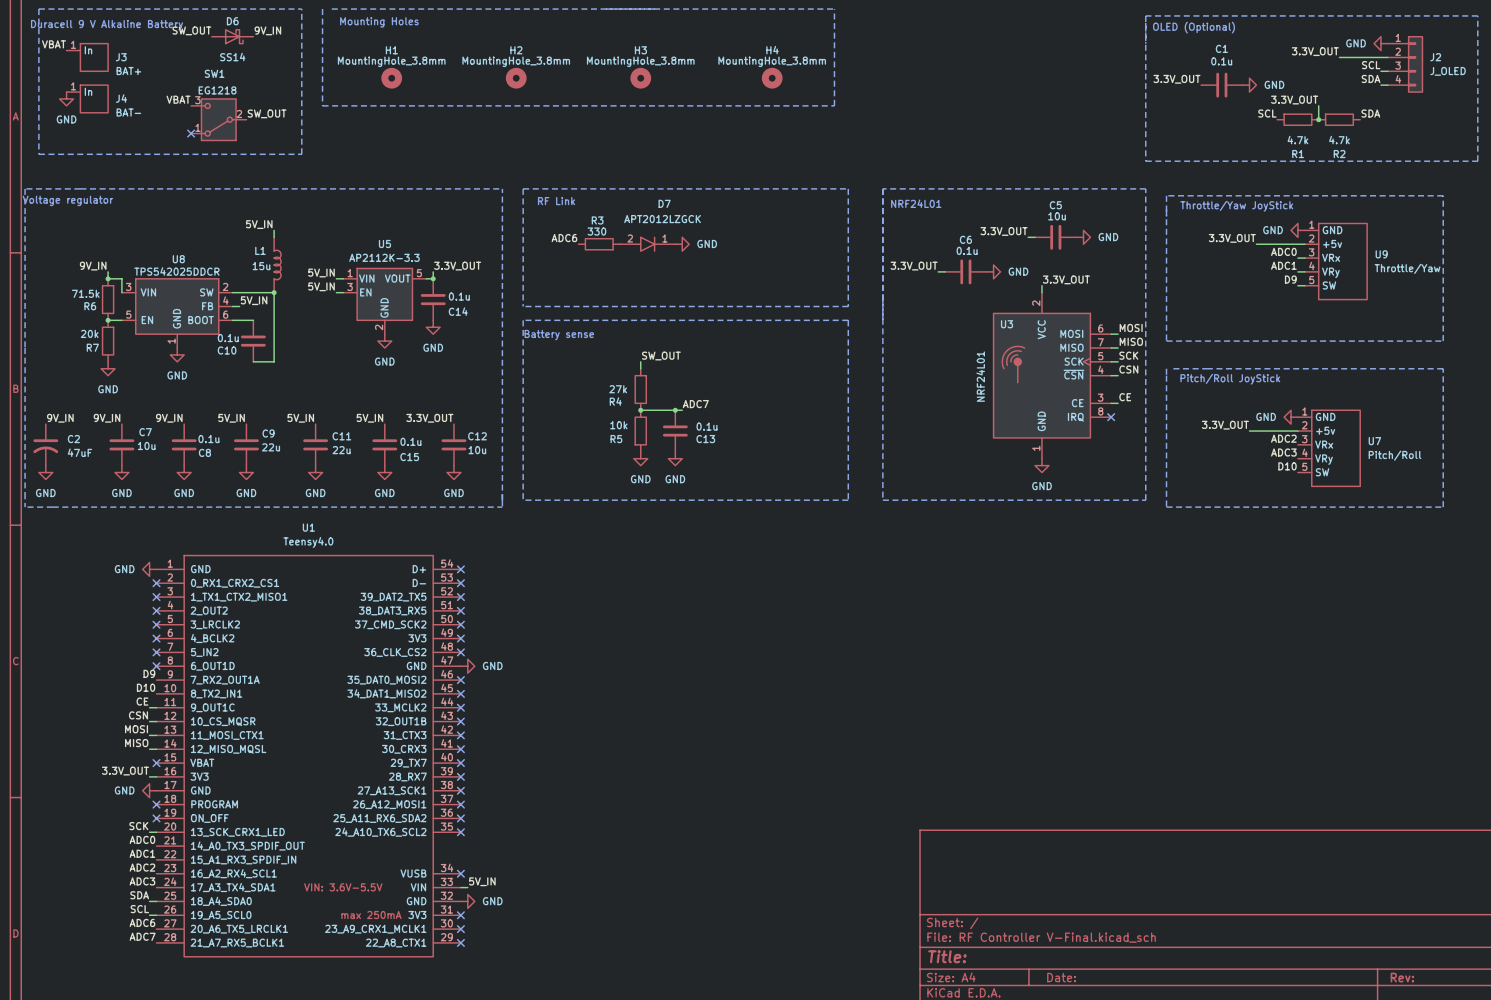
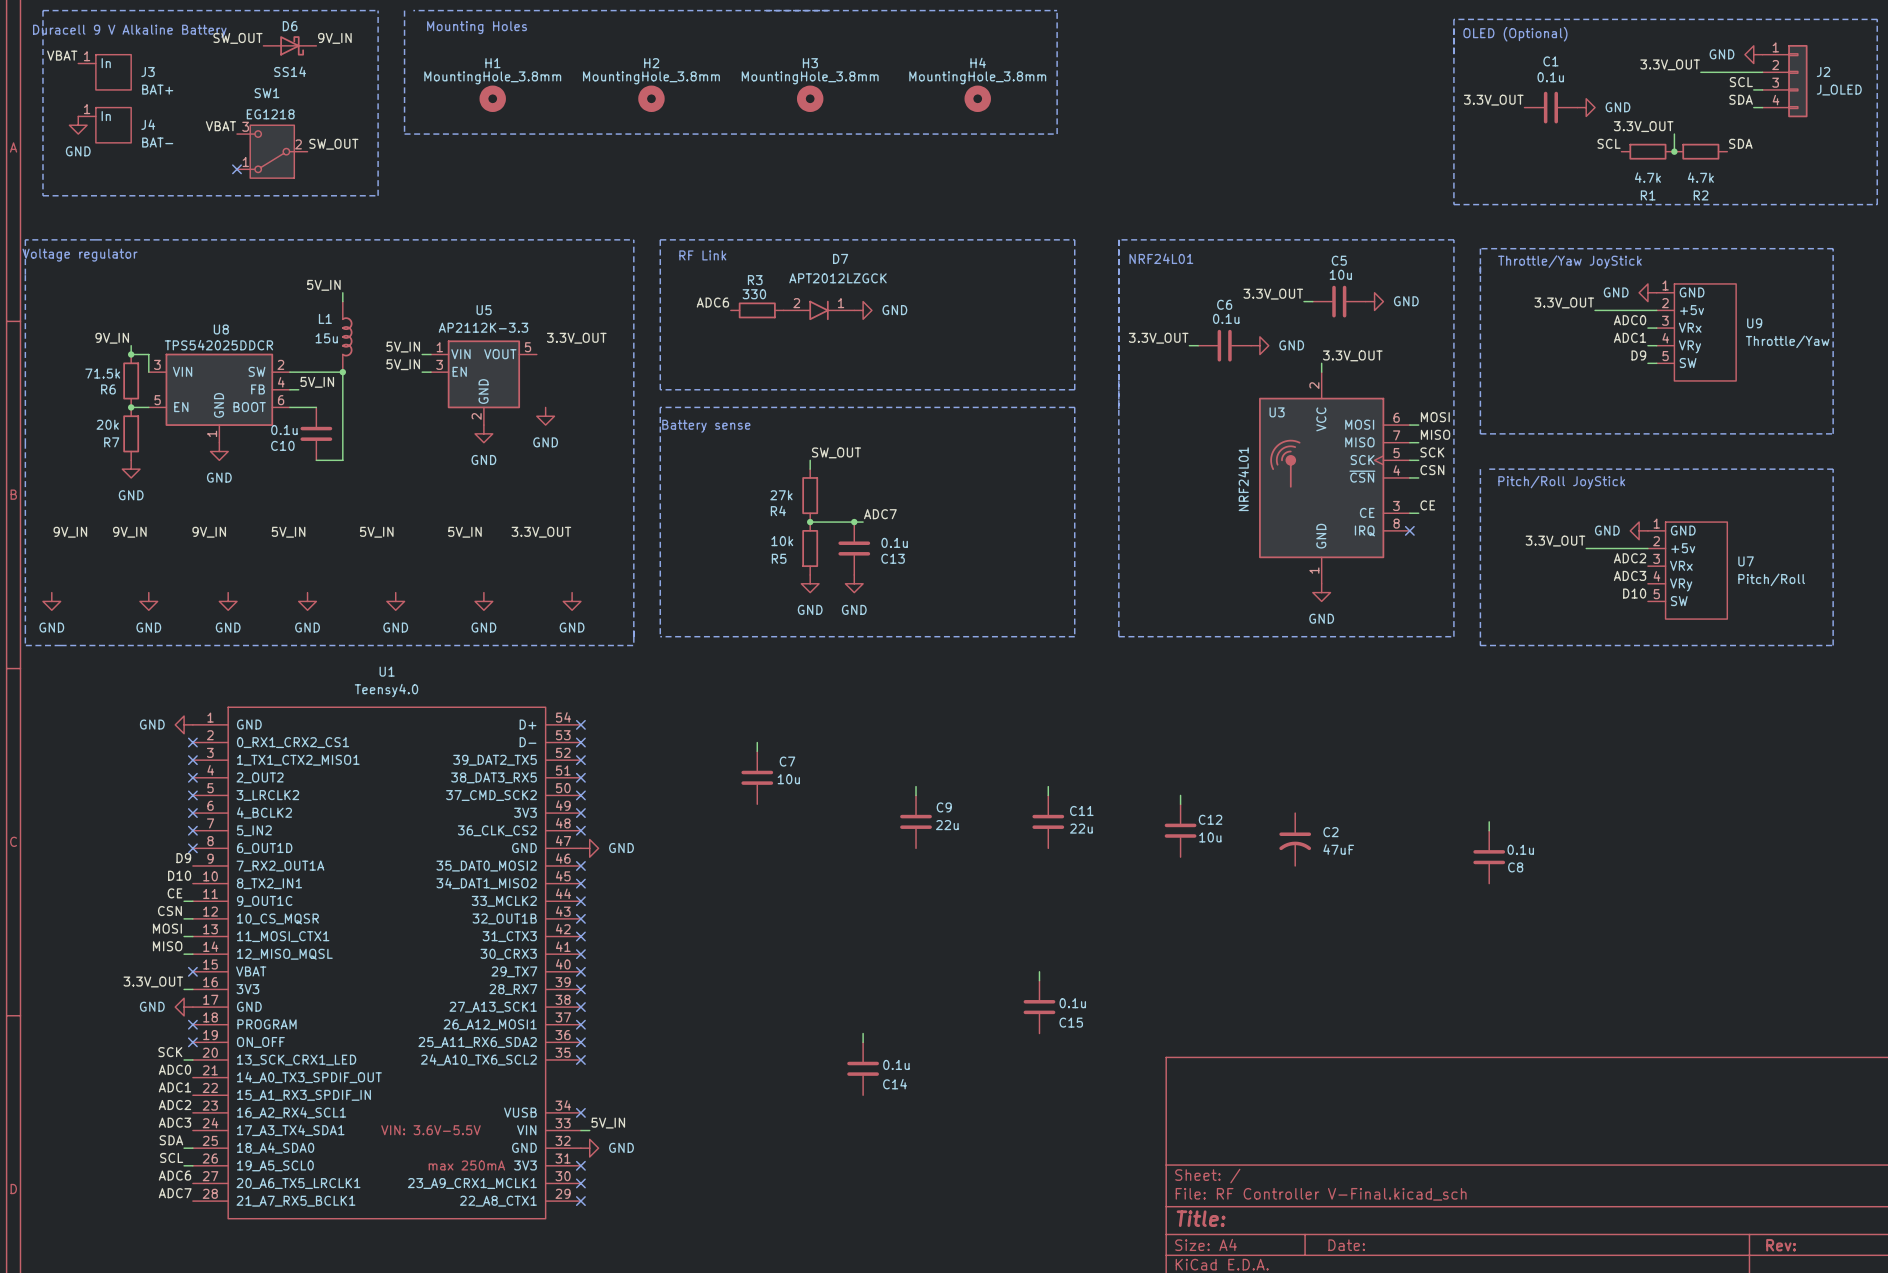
wire: (433, 271) (433, 278) (426, 278) -> none
junction: (433, 278) -> none
C14 position: (433, 299) -> (863, 1068)
C2 position: (45, 444) -> (1295, 839)
C7 position: (121, 444) -> (757, 777)
C8 position: (184, 444) -> (1489, 857)
C9 position: (246, 444) -> (916, 821)
C11 position: (315, 444) -> (1048, 821)
C15 position: (384, 444) -> (1039, 1007)
C12 position: (453, 444) -> (1180, 830)
wire: none -> (757, 742) (757, 751)
wire: none -> (916, 786) (916, 795)
wire: none -> (1048, 786) (1048, 795)
wire: none -> (1180, 795) (1180, 804)
wire: none -> (1489, 821) (1489, 830)
wire: none -> (1039, 971) (1039, 980)
wire: none -> (863, 1033) (863, 1042)

